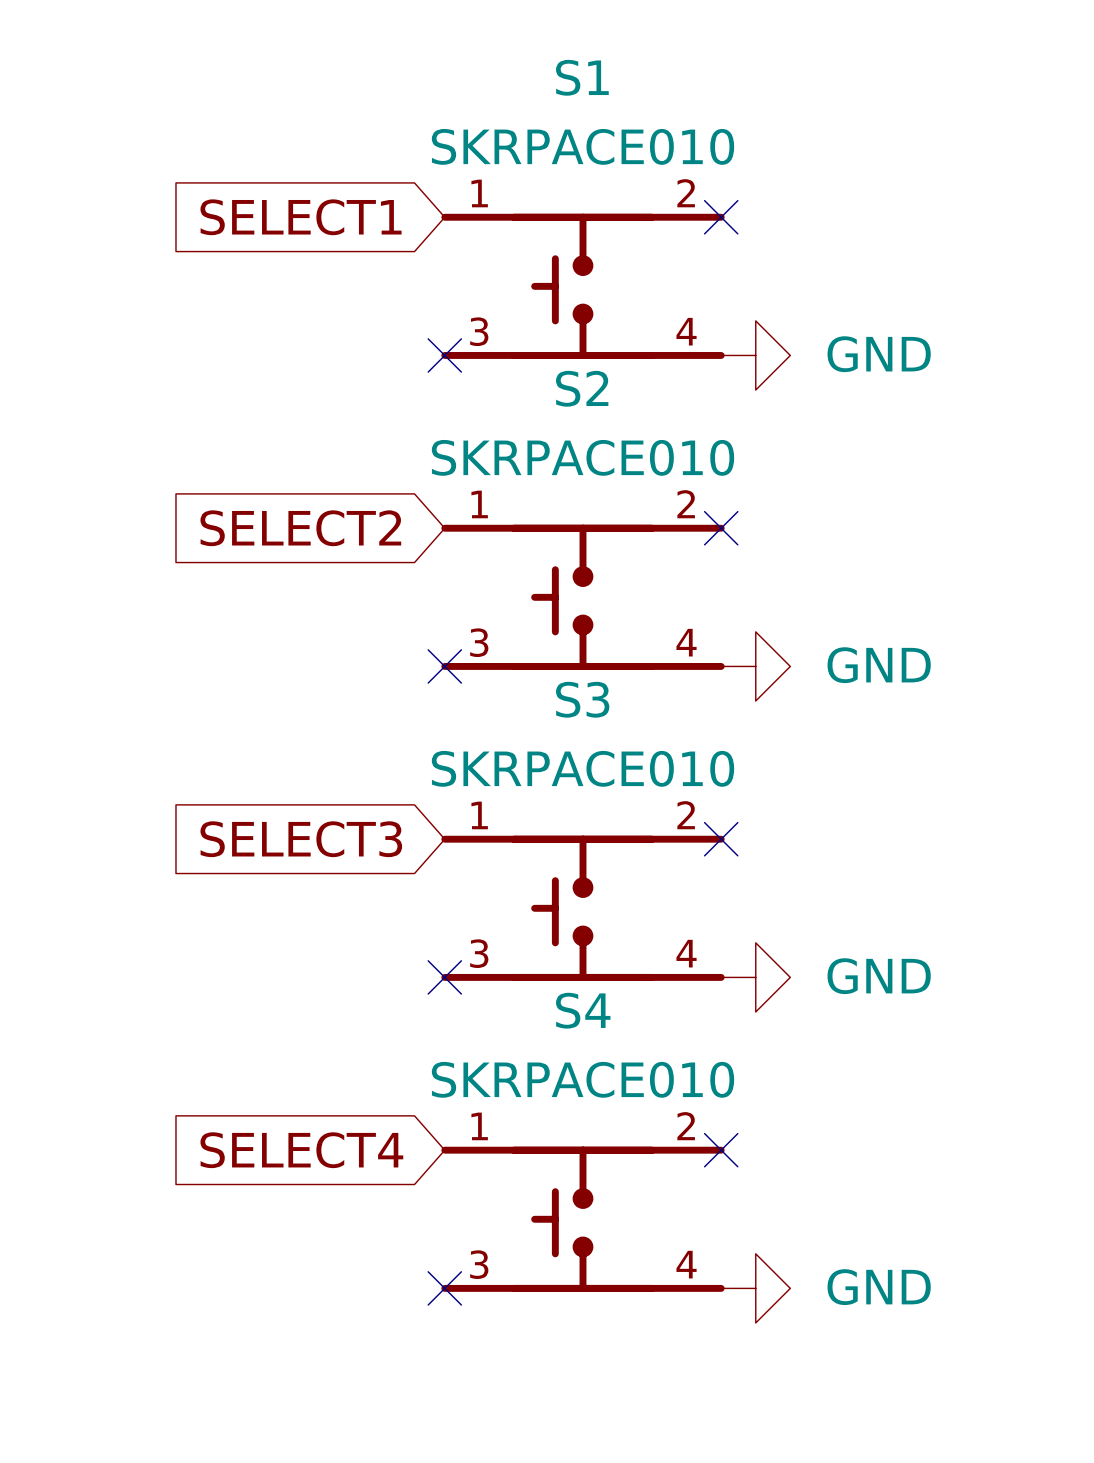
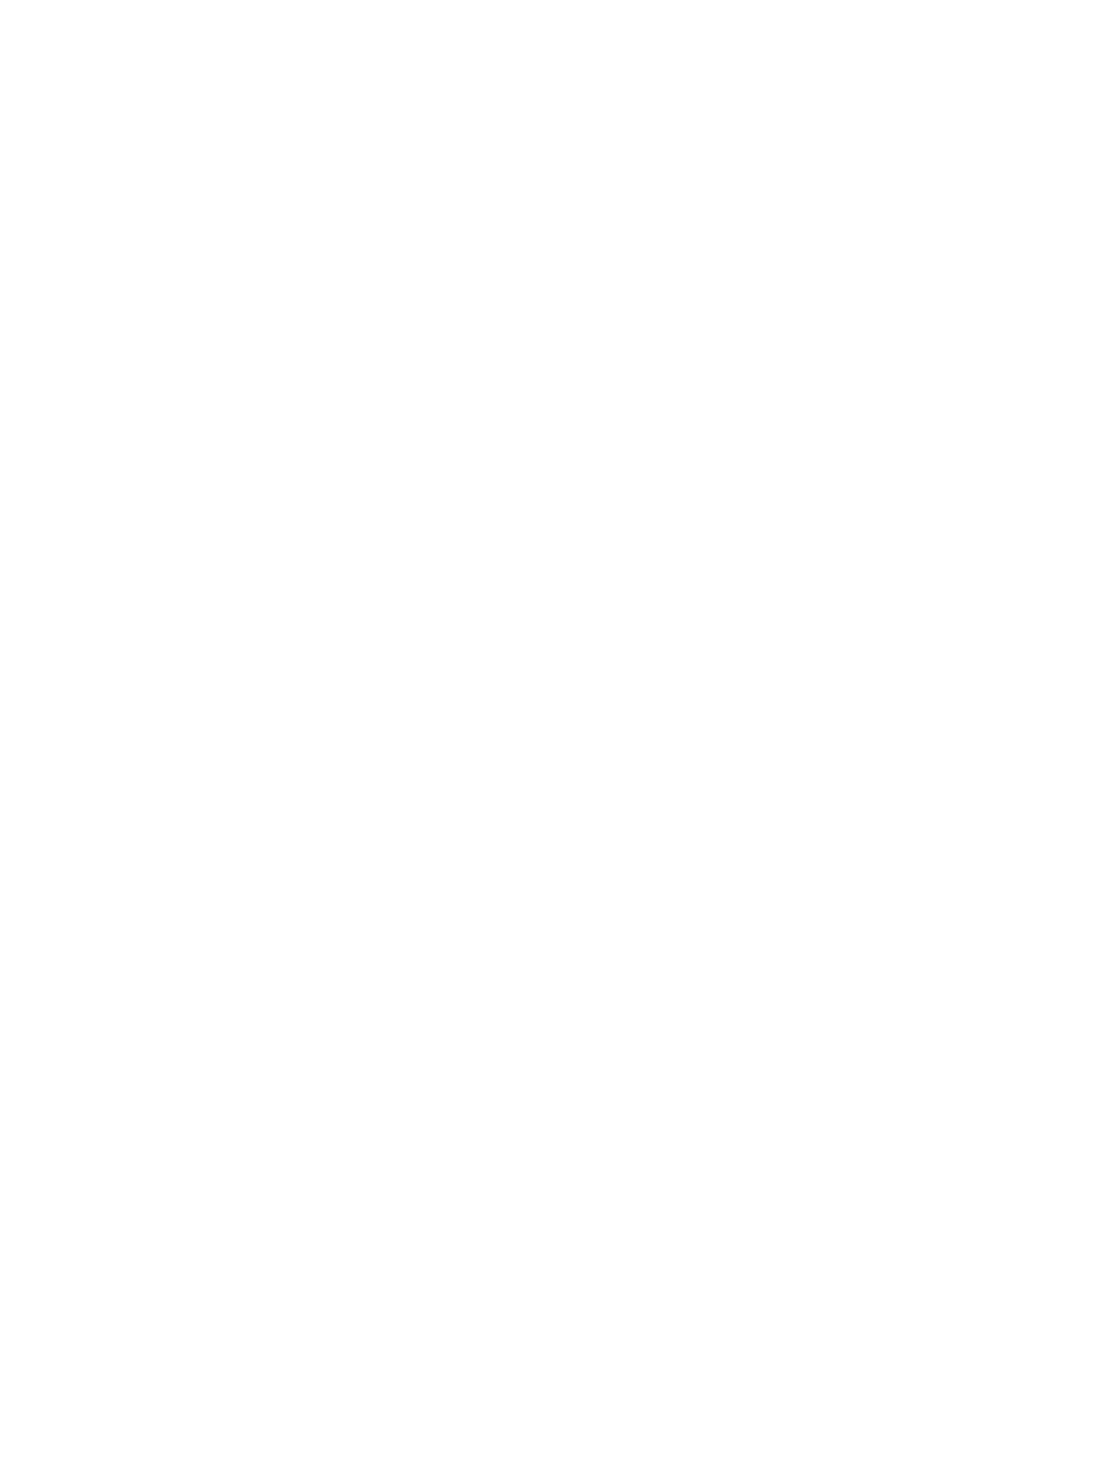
global label: SELECT1 (301, 217) -> none
no-connect mark: (721, 217) -> none
S1: SKRPACE010 (583, 286) -> none
no-connect mark: (444, 355) -> none
power symbol: GND (755, 355) -> none
global label: SELECT2 (300, 528) -> none
no-connect mark: (721, 528) -> none
S2: SKRPACE010 (583, 597) -> none
no-connect mark: (444, 666) -> none
power symbol: GND (755, 666) -> none
global label: SELECT3 (301, 839) -> none
no-connect mark: (721, 839) -> none
S3: SKRPACE010 (583, 908) -> none
no-connect mark: (444, 977) -> none
power symbol: GND (755, 977) -> none
global label: SELECT4 (301, 1150) -> none
no-connect mark: (721, 1150) -> none
S4: SKRPACE010 (583, 1219) -> none
no-connect mark: (444, 1288) -> none
power symbol: GND (755, 1288) -> none

